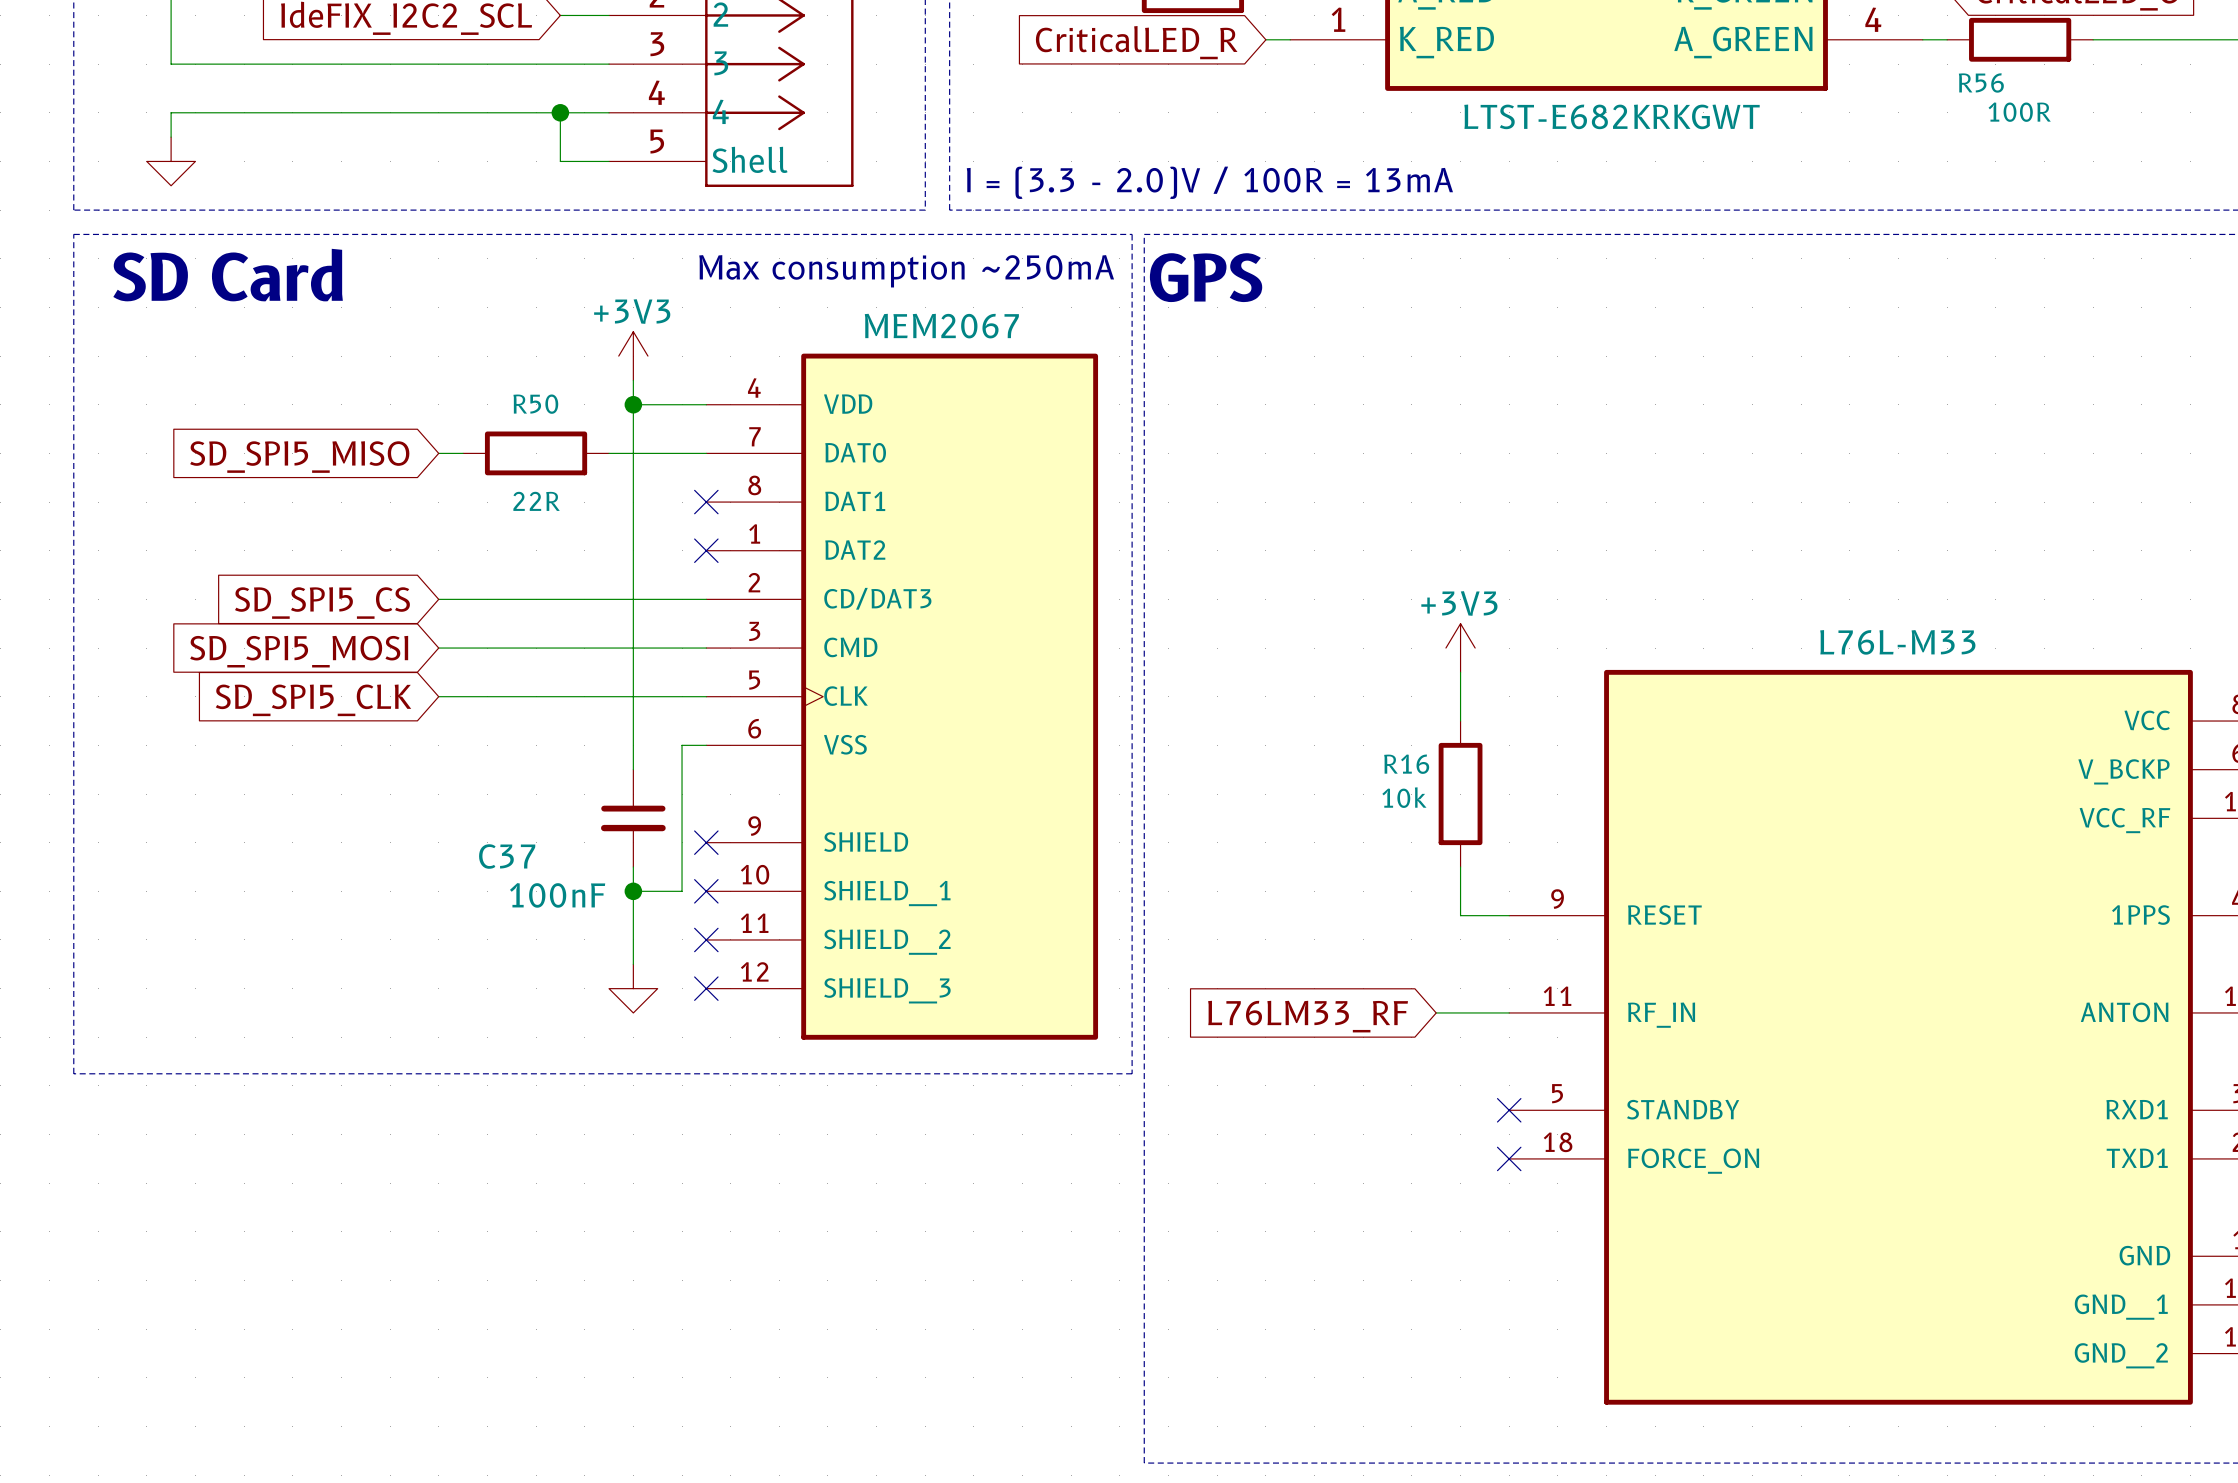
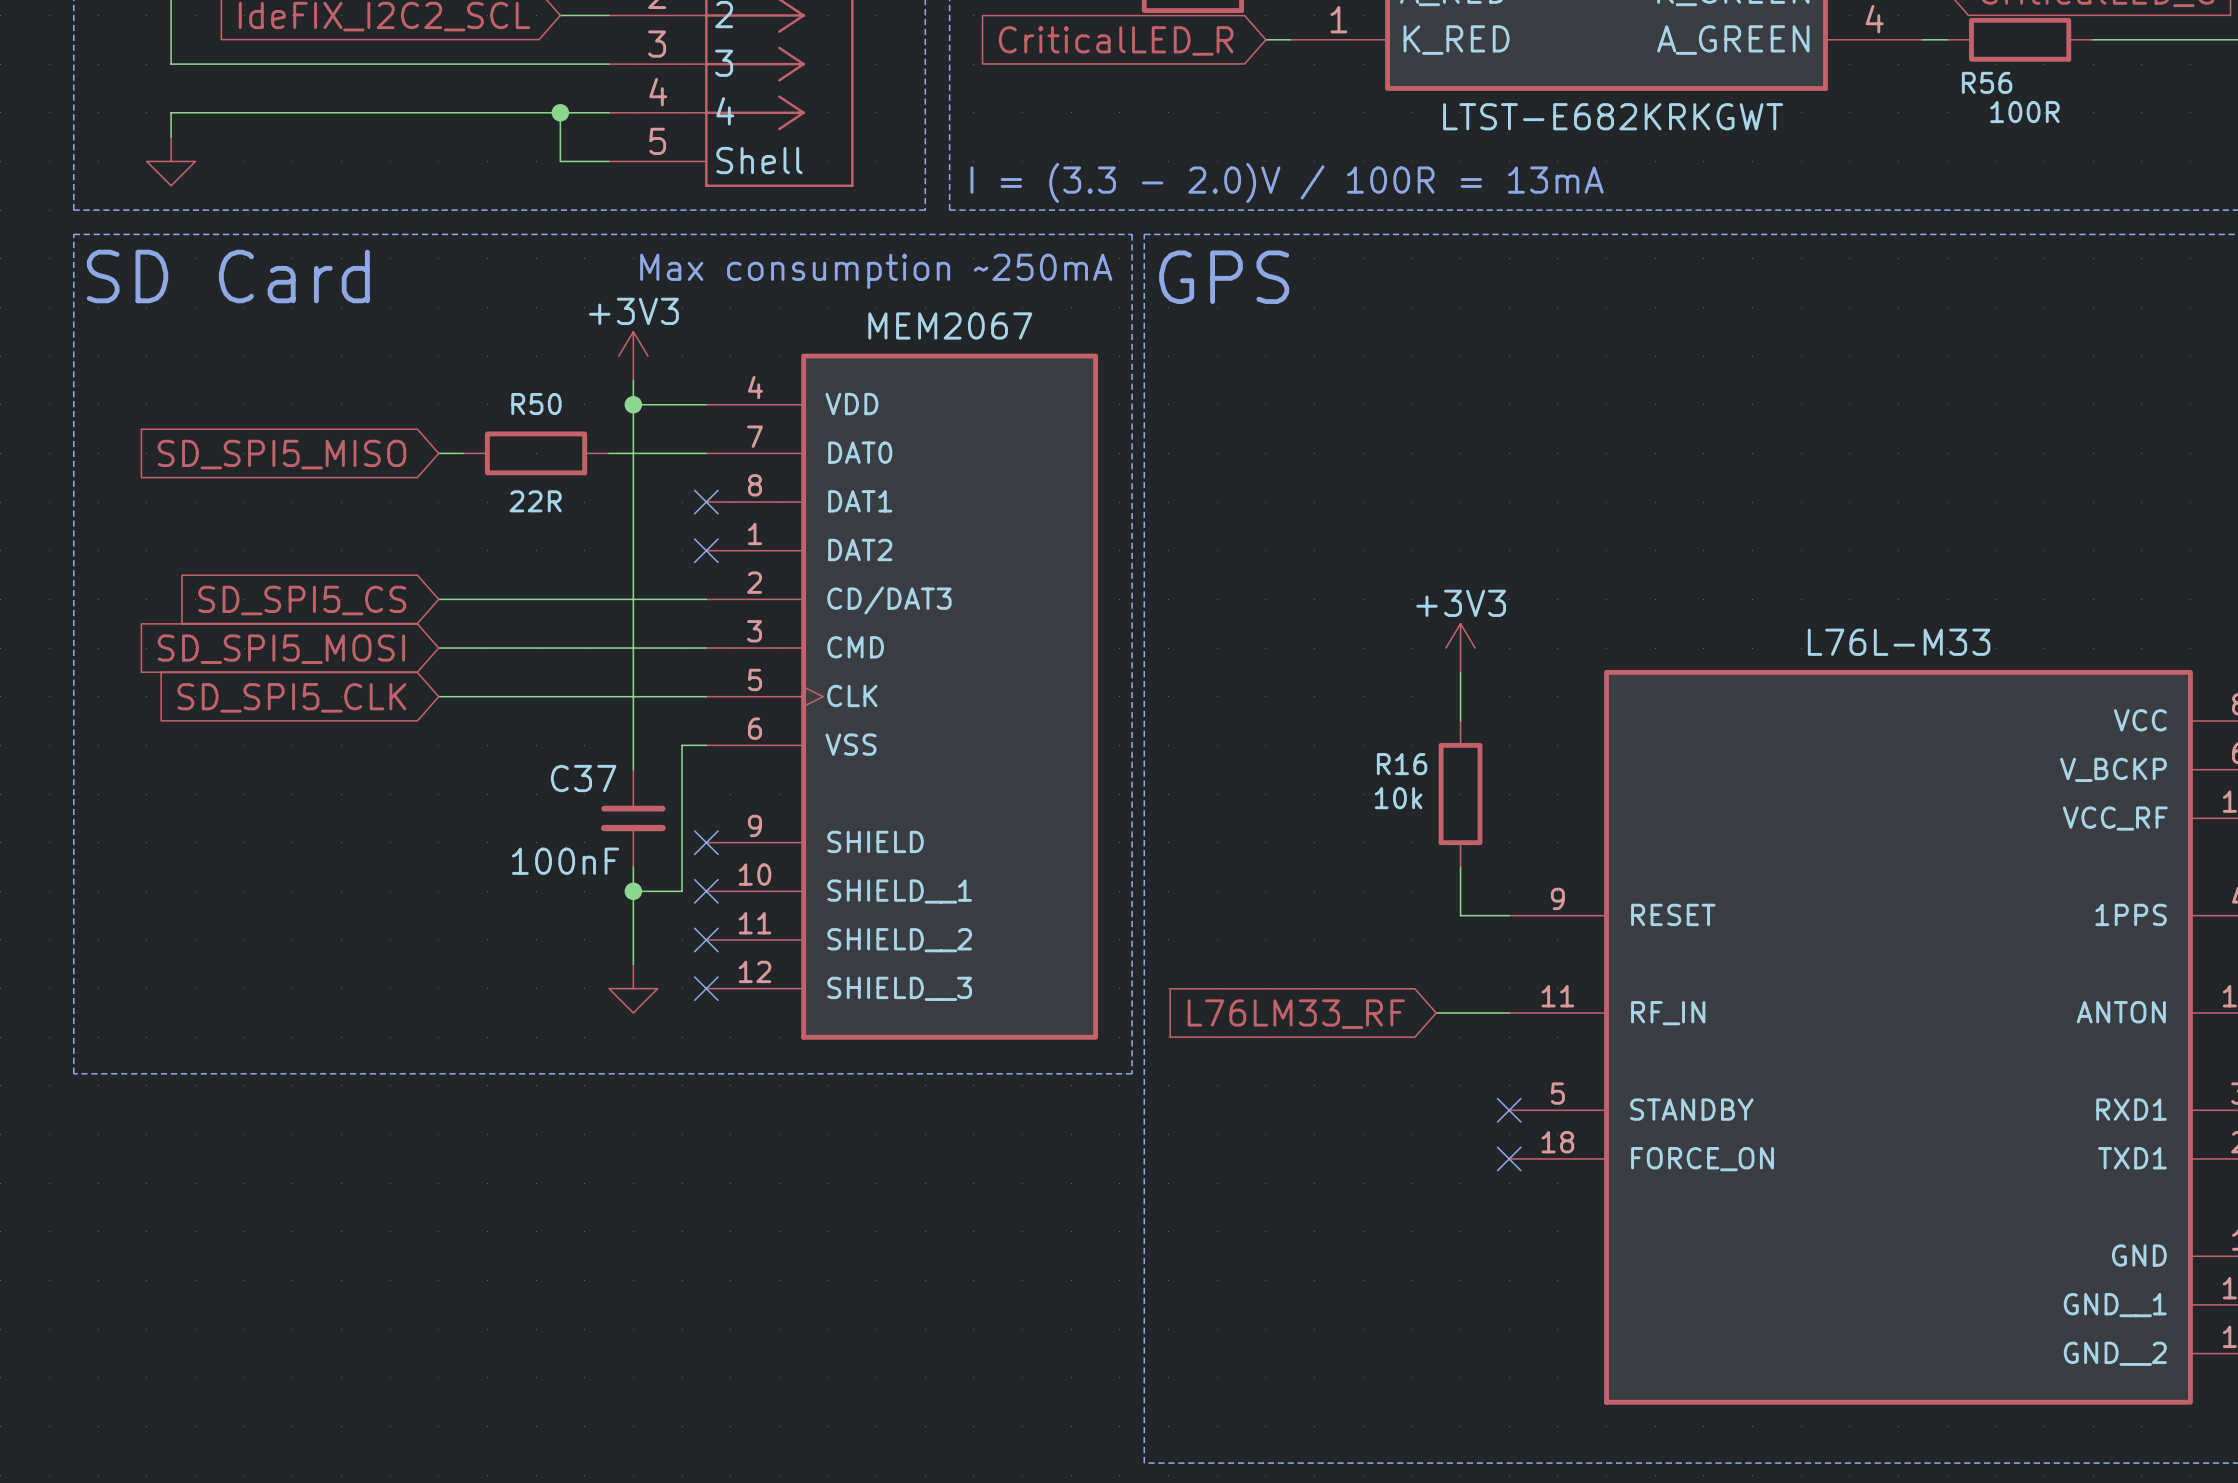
C37 name position: C37 (507, 856) -> C37 (583, 778)
C37 value position: 100nF (557, 895) -> 100nF (565, 861)

